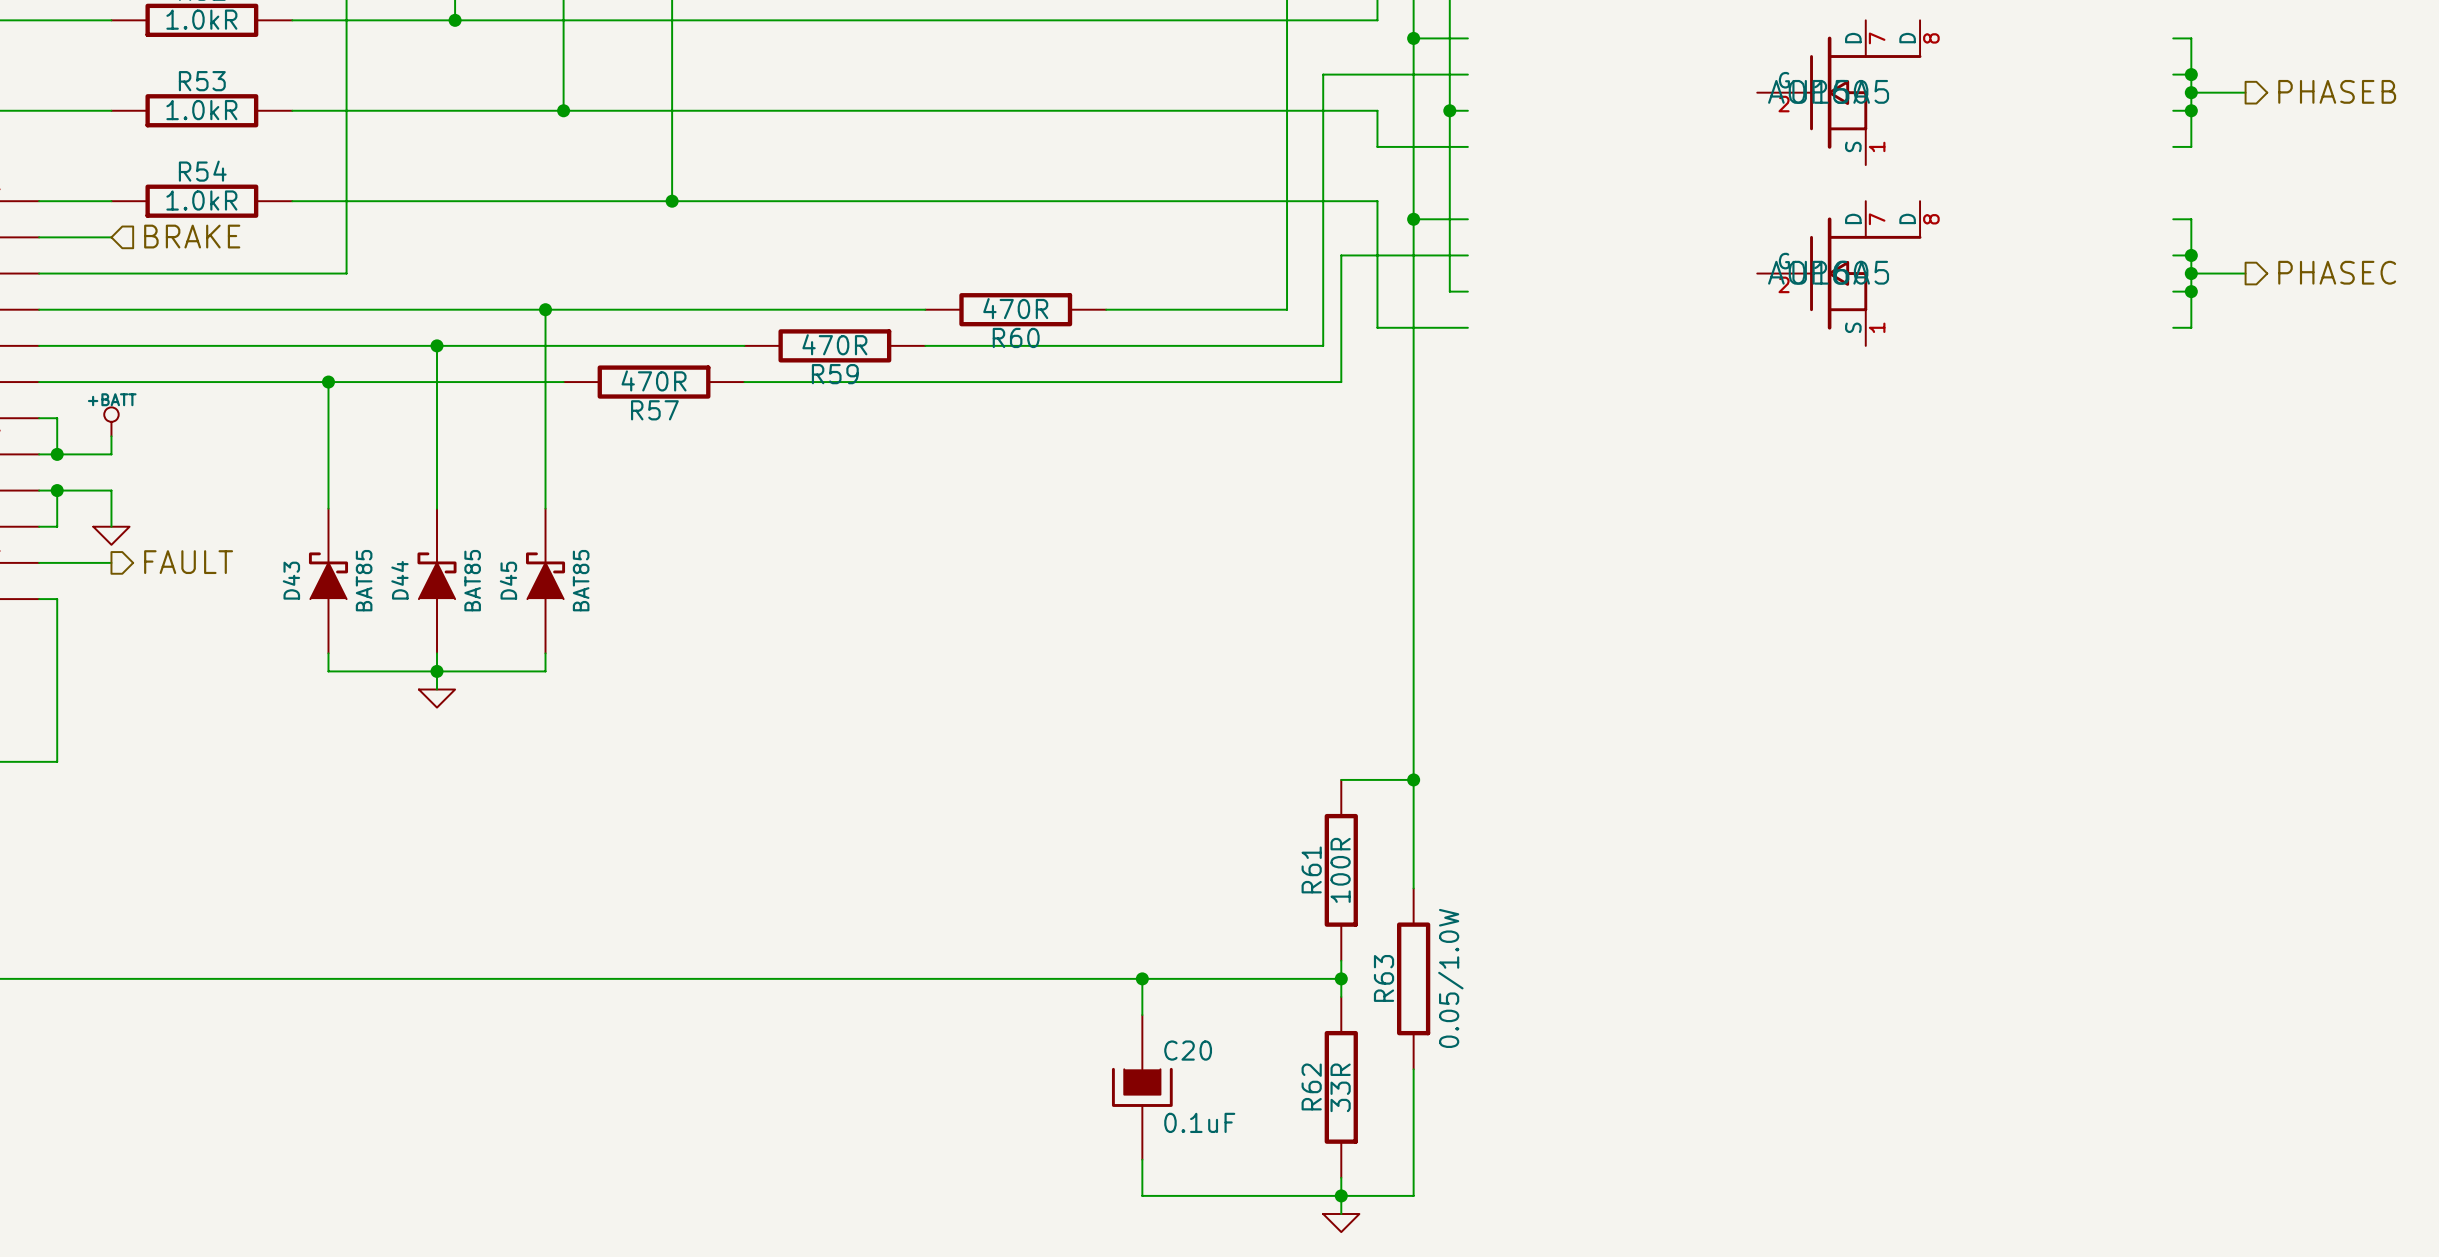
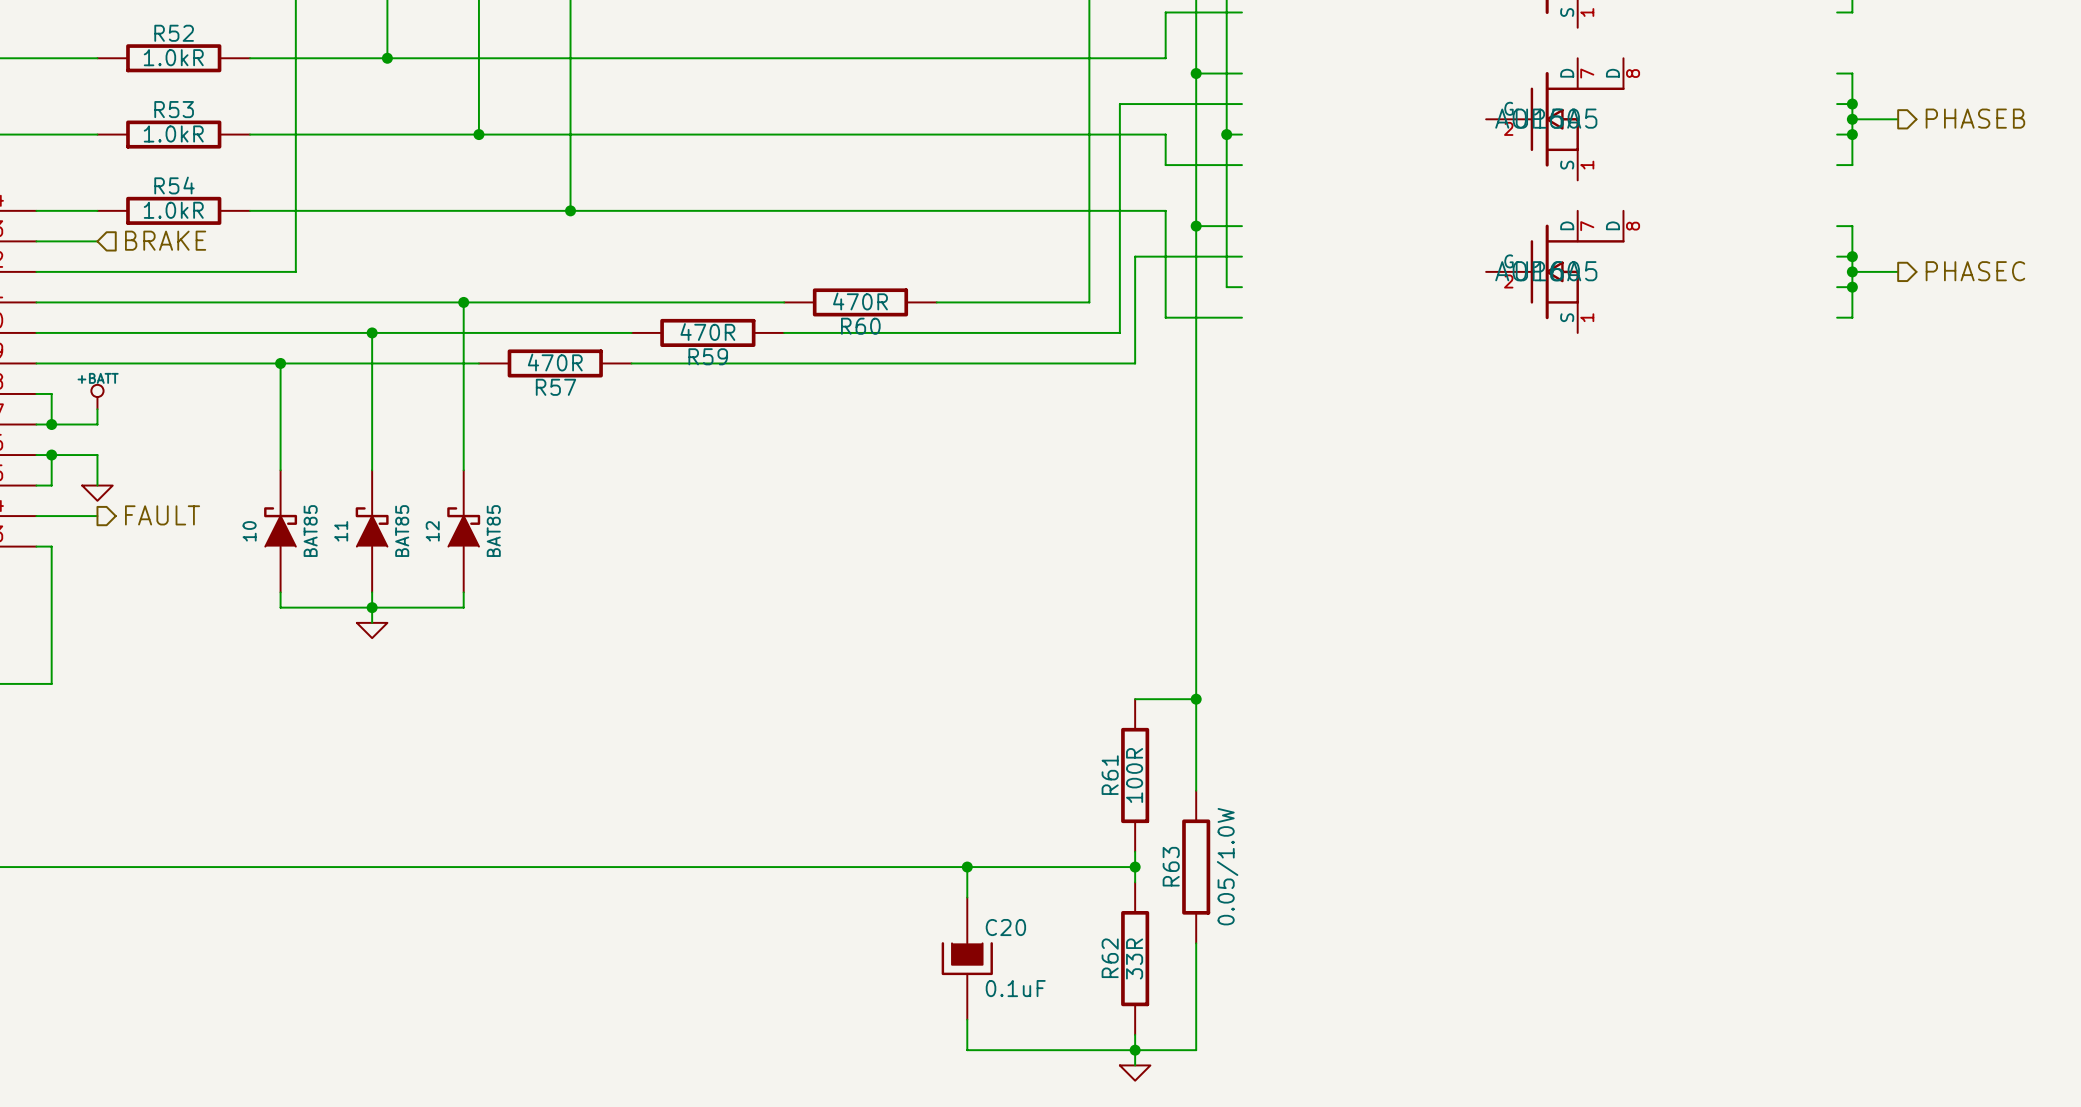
D43 name: D43 (291, 580) -> 10 (249, 531)
D44 name: D44 (399, 580) -> 11 (341, 531)
D45 name: D45 (508, 580) -> 12 (432, 531)

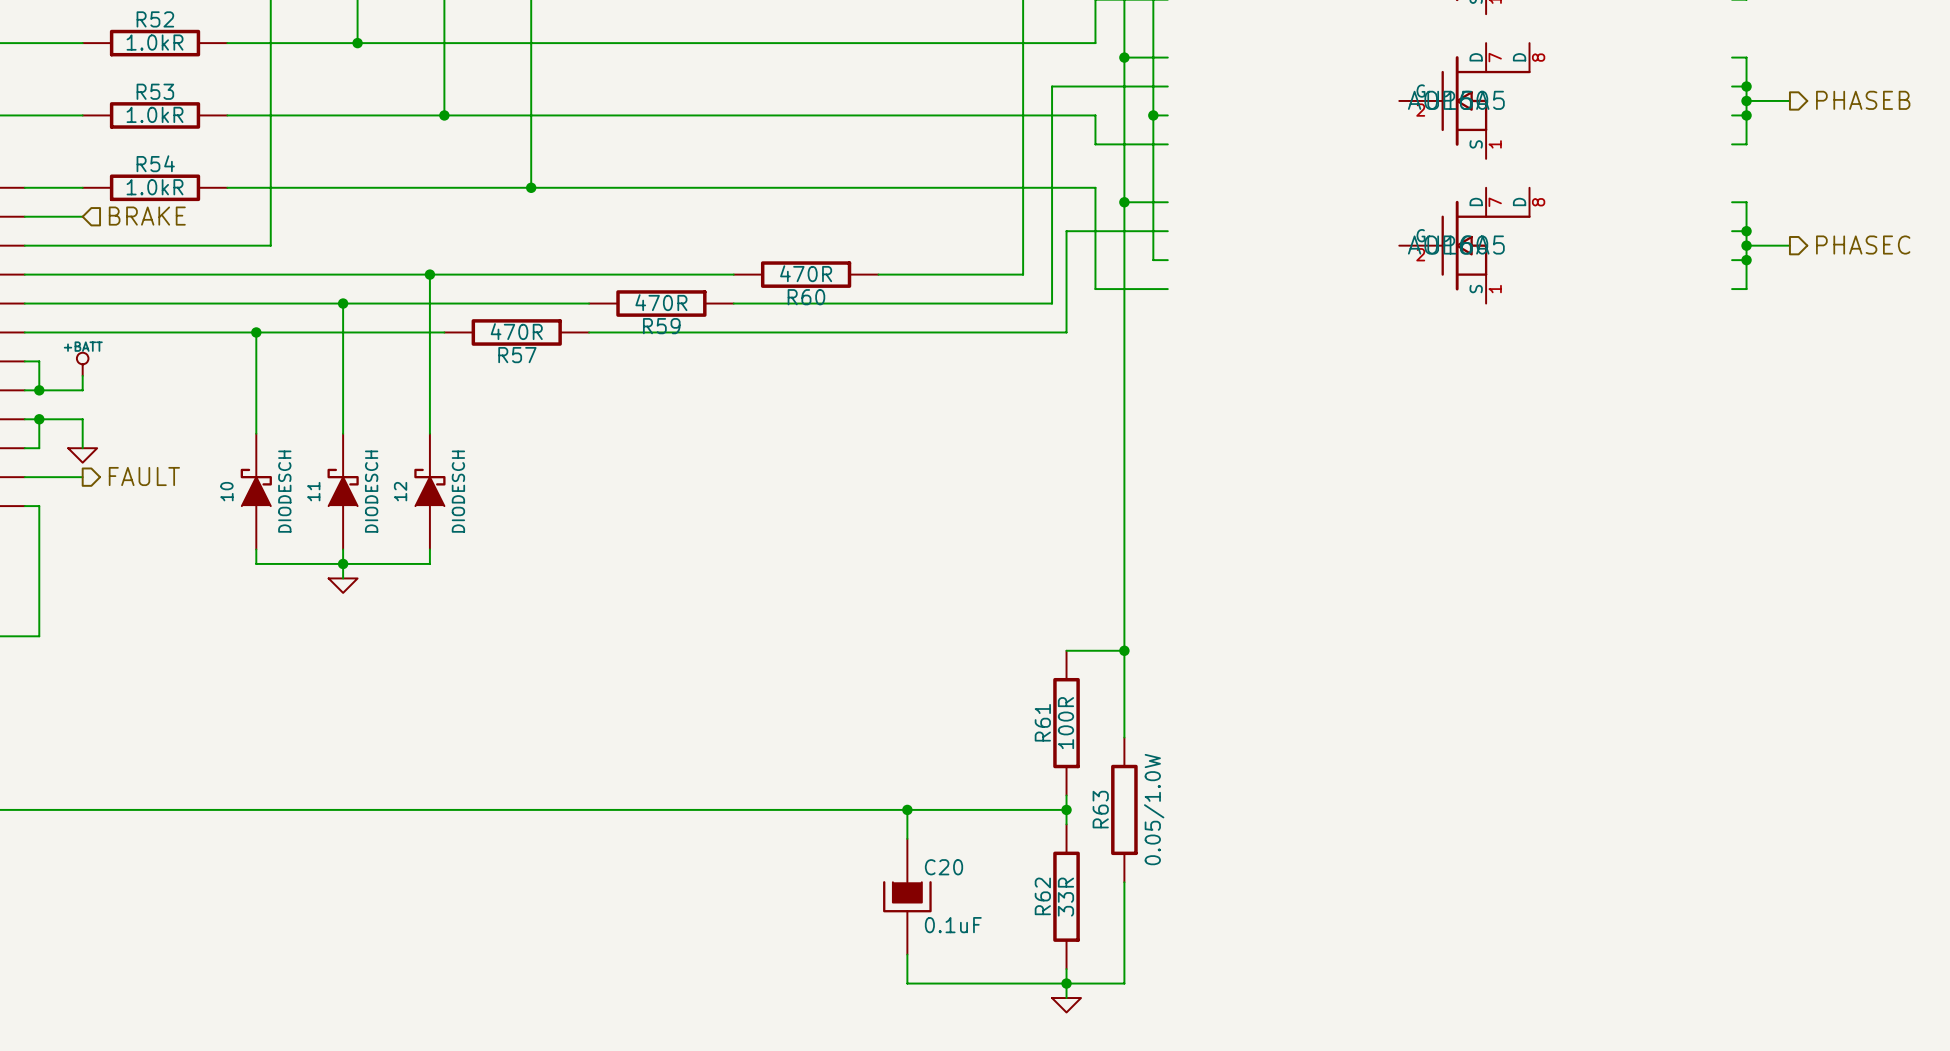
10 value: BAT85 (310, 531) -> DIODESCH (284, 491)
11 value: BAT85 (402, 531) -> DIODESCH (371, 491)
12 value: BAT85 (493, 531) -> DIODESCH (458, 491)

